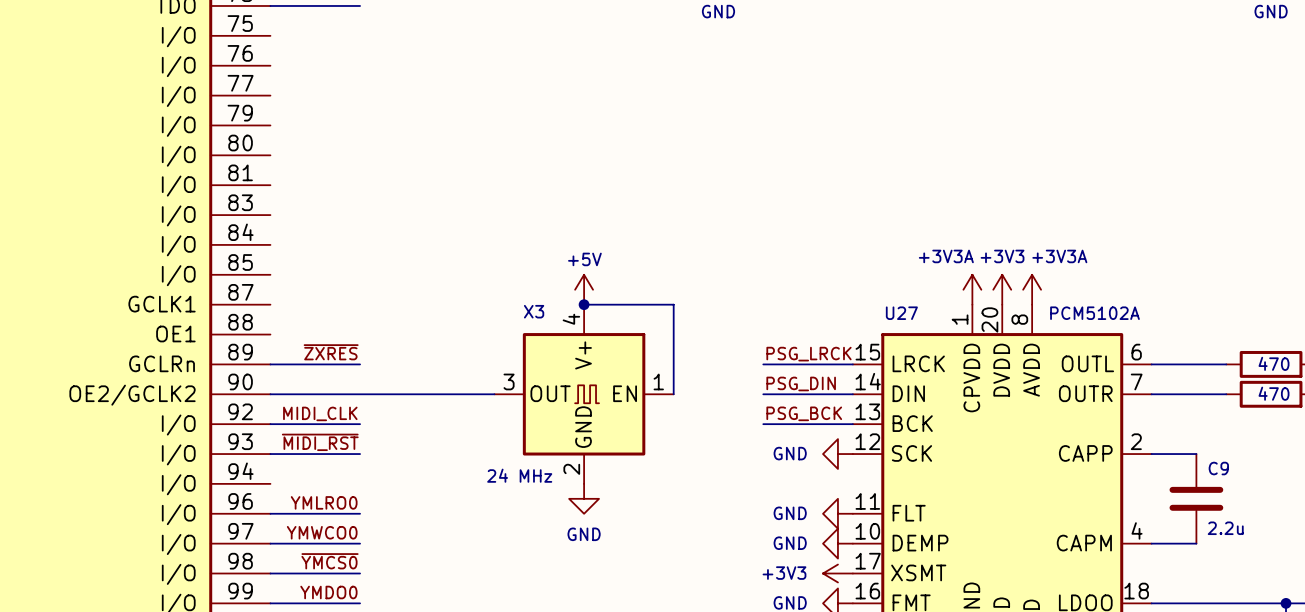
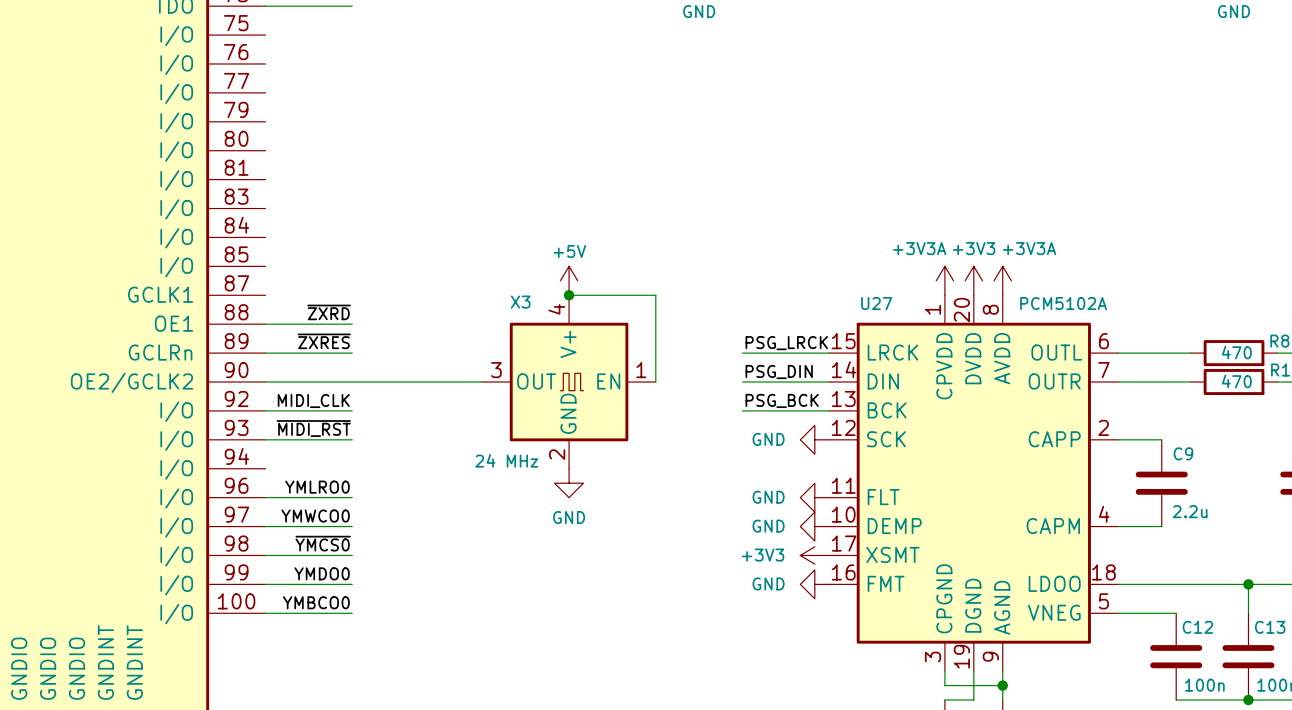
label: none -> ~{ZXRD} (329, 312)
wire: none -> (265, 324) (352, 324)

